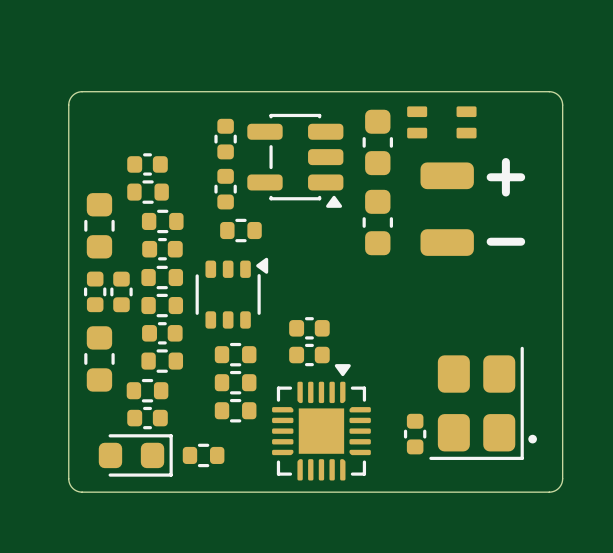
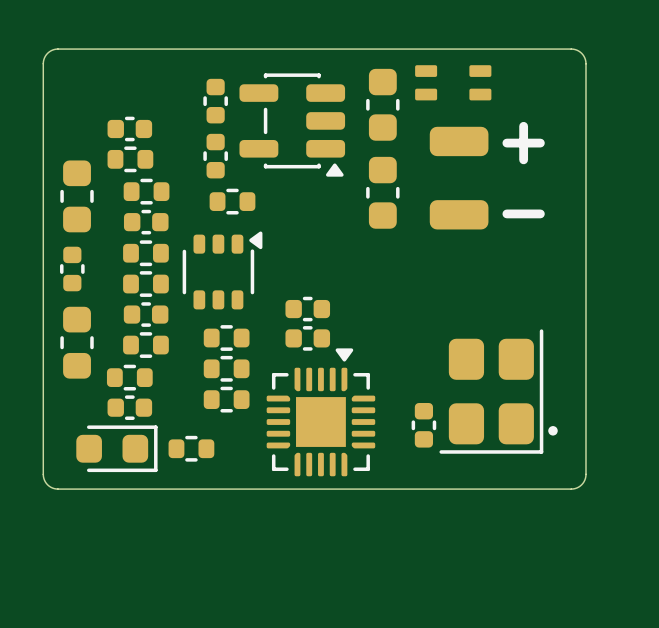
part: (121, 291) -> none

